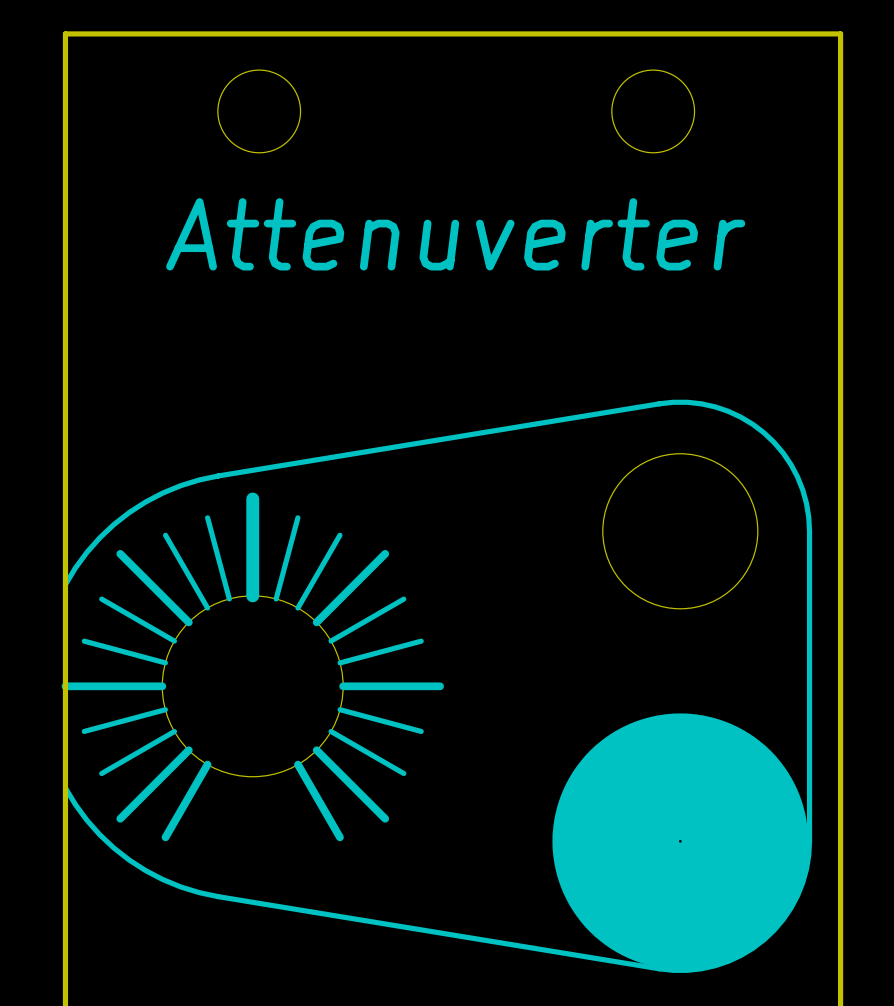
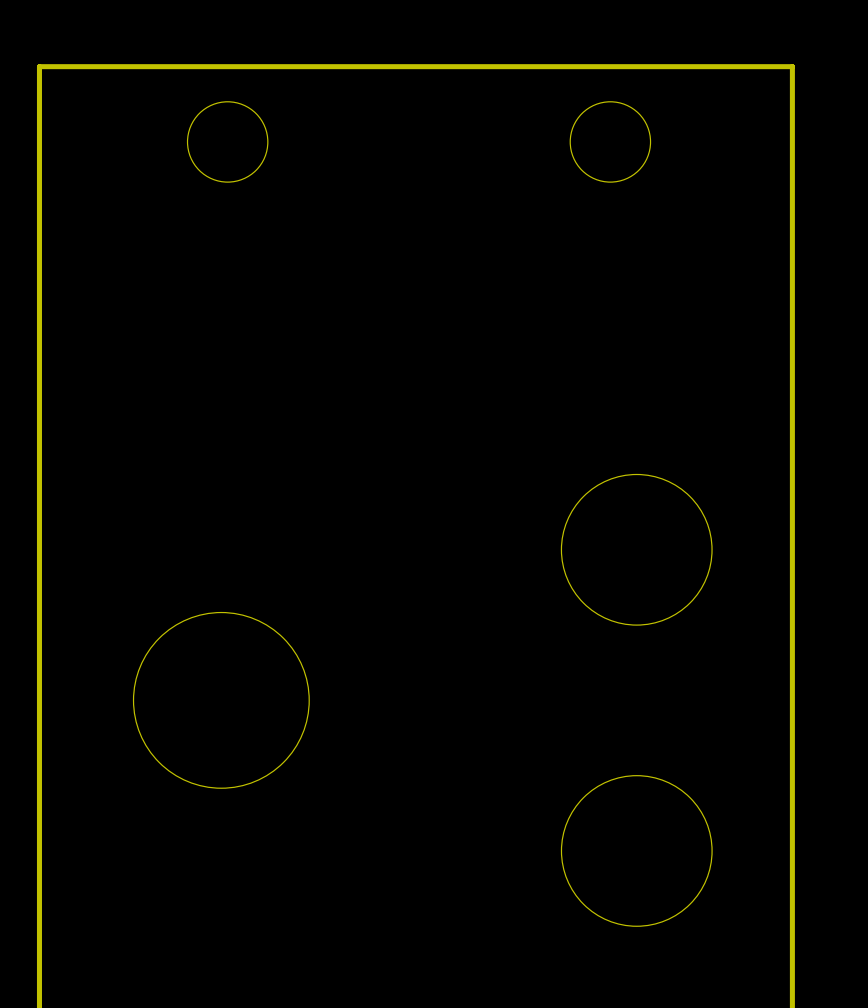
text: Attenuverter (455, 234) -> none
line: (252, 498) (252, 595) -> none
line: (207, 517) (229, 598) -> none
line: (297, 517) (276, 598) -> none
line: (165, 535) (207, 607) -> none
line: (339, 535) (297, 607) -> none
line: (120, 553) (188, 622) -> none
line: (385, 553) (316, 622) -> none
line: (65, 584) (86, 552) (99, 537) (129, 512) (162, 493) (199, 479) (659, 403) (687, 402) (714, 406) (728, 411) (752, 424) (774, 442) (791, 464) (797, 477) (806, 503) (809, 531) (808, 855) (802, 882) (791, 907) (783, 919) (764, 939) (752, 948) (728, 961) (701, 968) (673, 970) (199, 892) (162, 879) (129, 860) (114, 848) (86, 820) (65, 788) -> none
line: (101, 599) (174, 641) -> none
line: (403, 599) (331, 641) -> none
line: (84, 641) (165, 662) -> none
line: (421, 641) (340, 662) -> none
line: (65, 686) (162, 686) -> none
line: (343, 686) (440, 686) -> none
line: (165, 709) (84, 731) -> none
line: (340, 709) (421, 731) -> none
drawing: [552, 713, 809, 970] -> none
line: (174, 731) (101, 773) -> none
line: (331, 731) (403, 773) -> none
line: (188, 750) (120, 818) -> none
line: (316, 750) (385, 818) -> none
line: (207, 764) (165, 837) -> none
line: (297, 764) (339, 837) -> none

